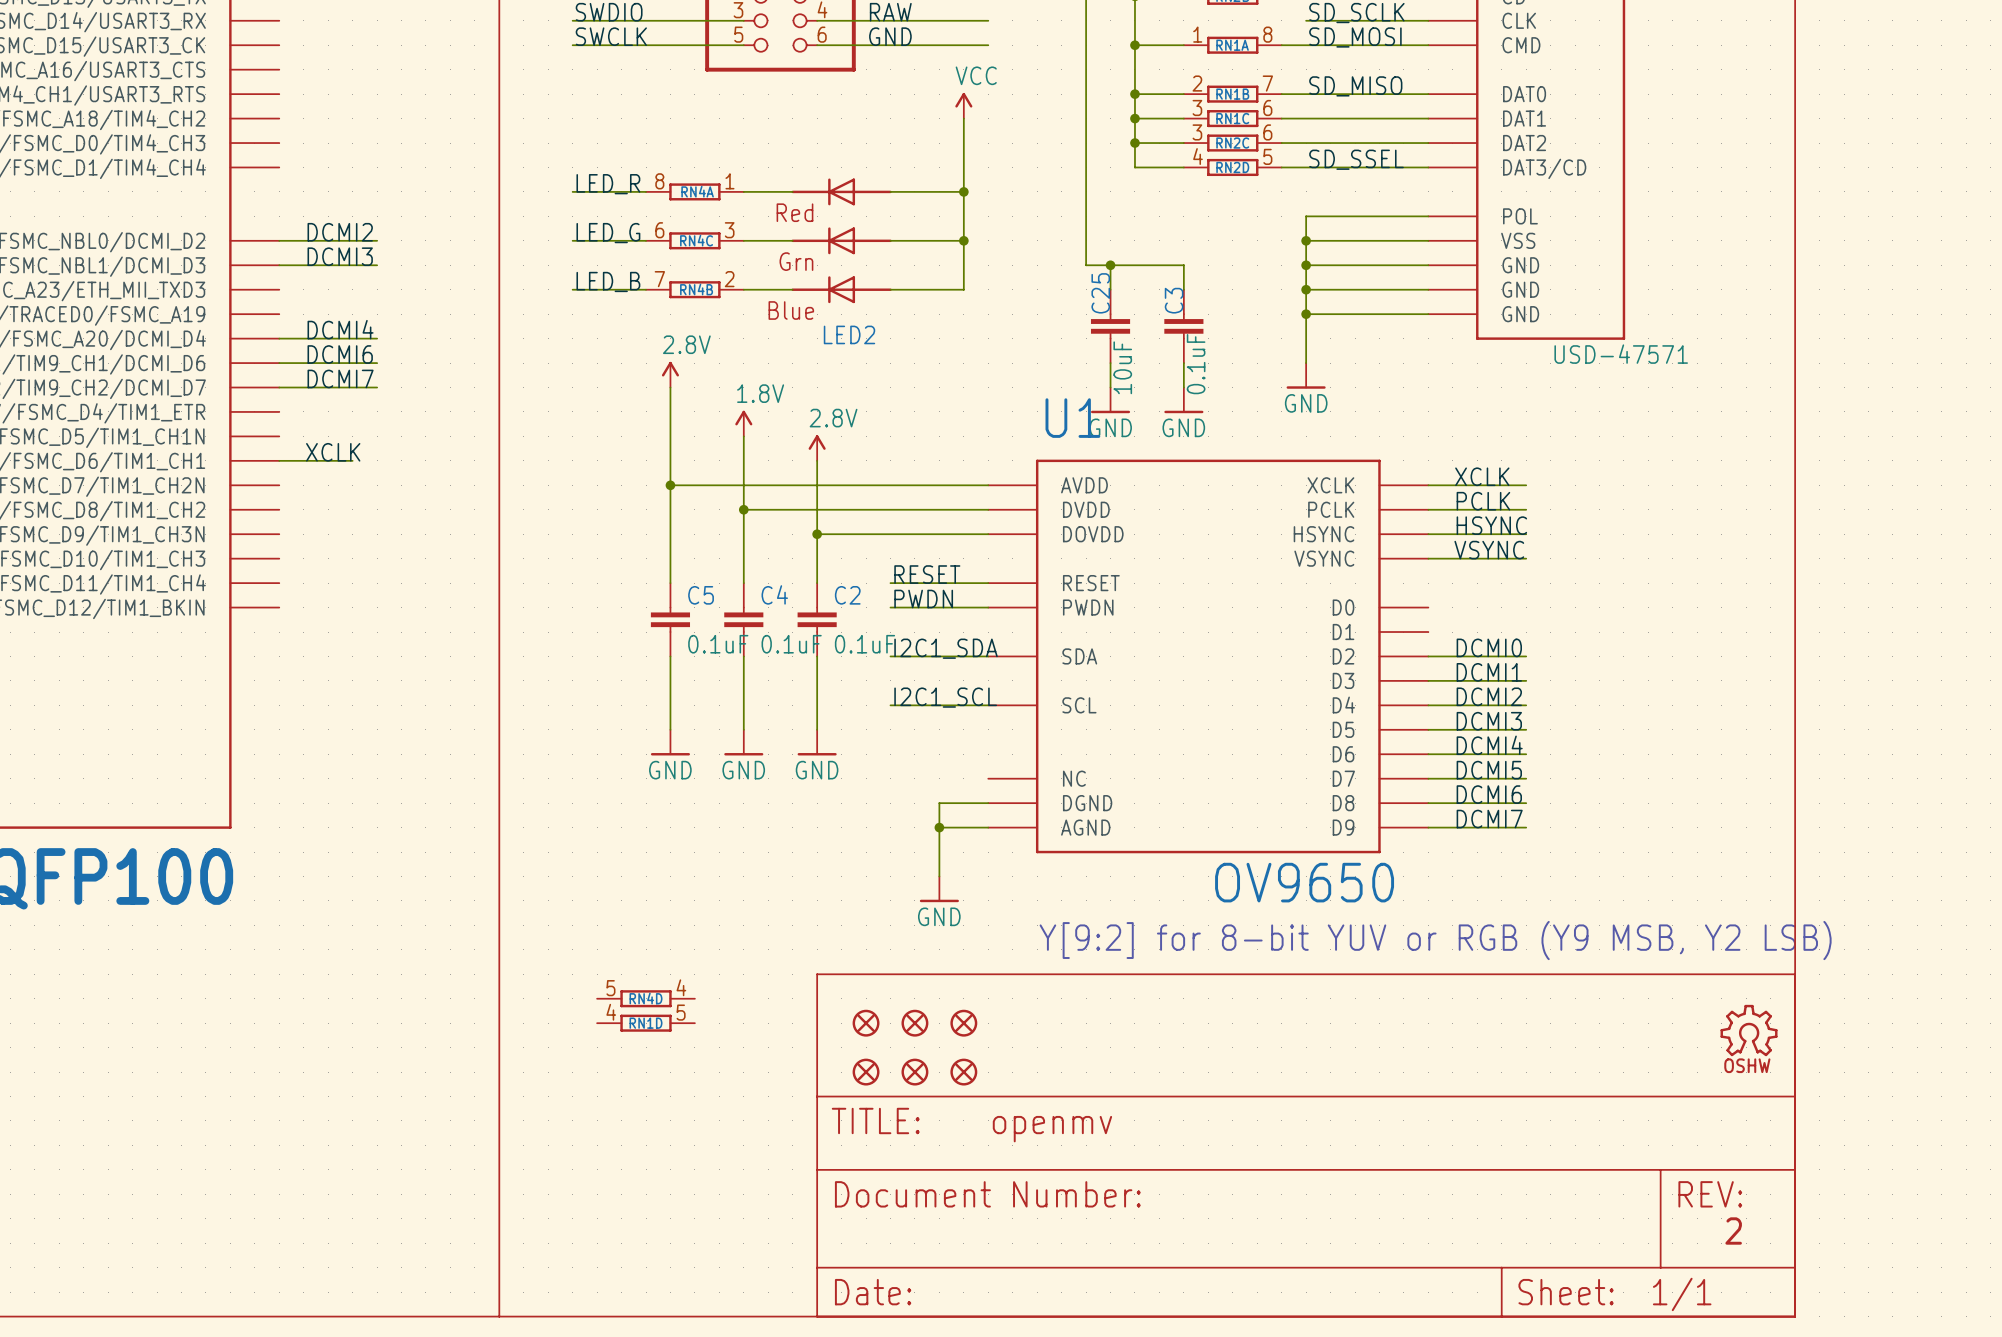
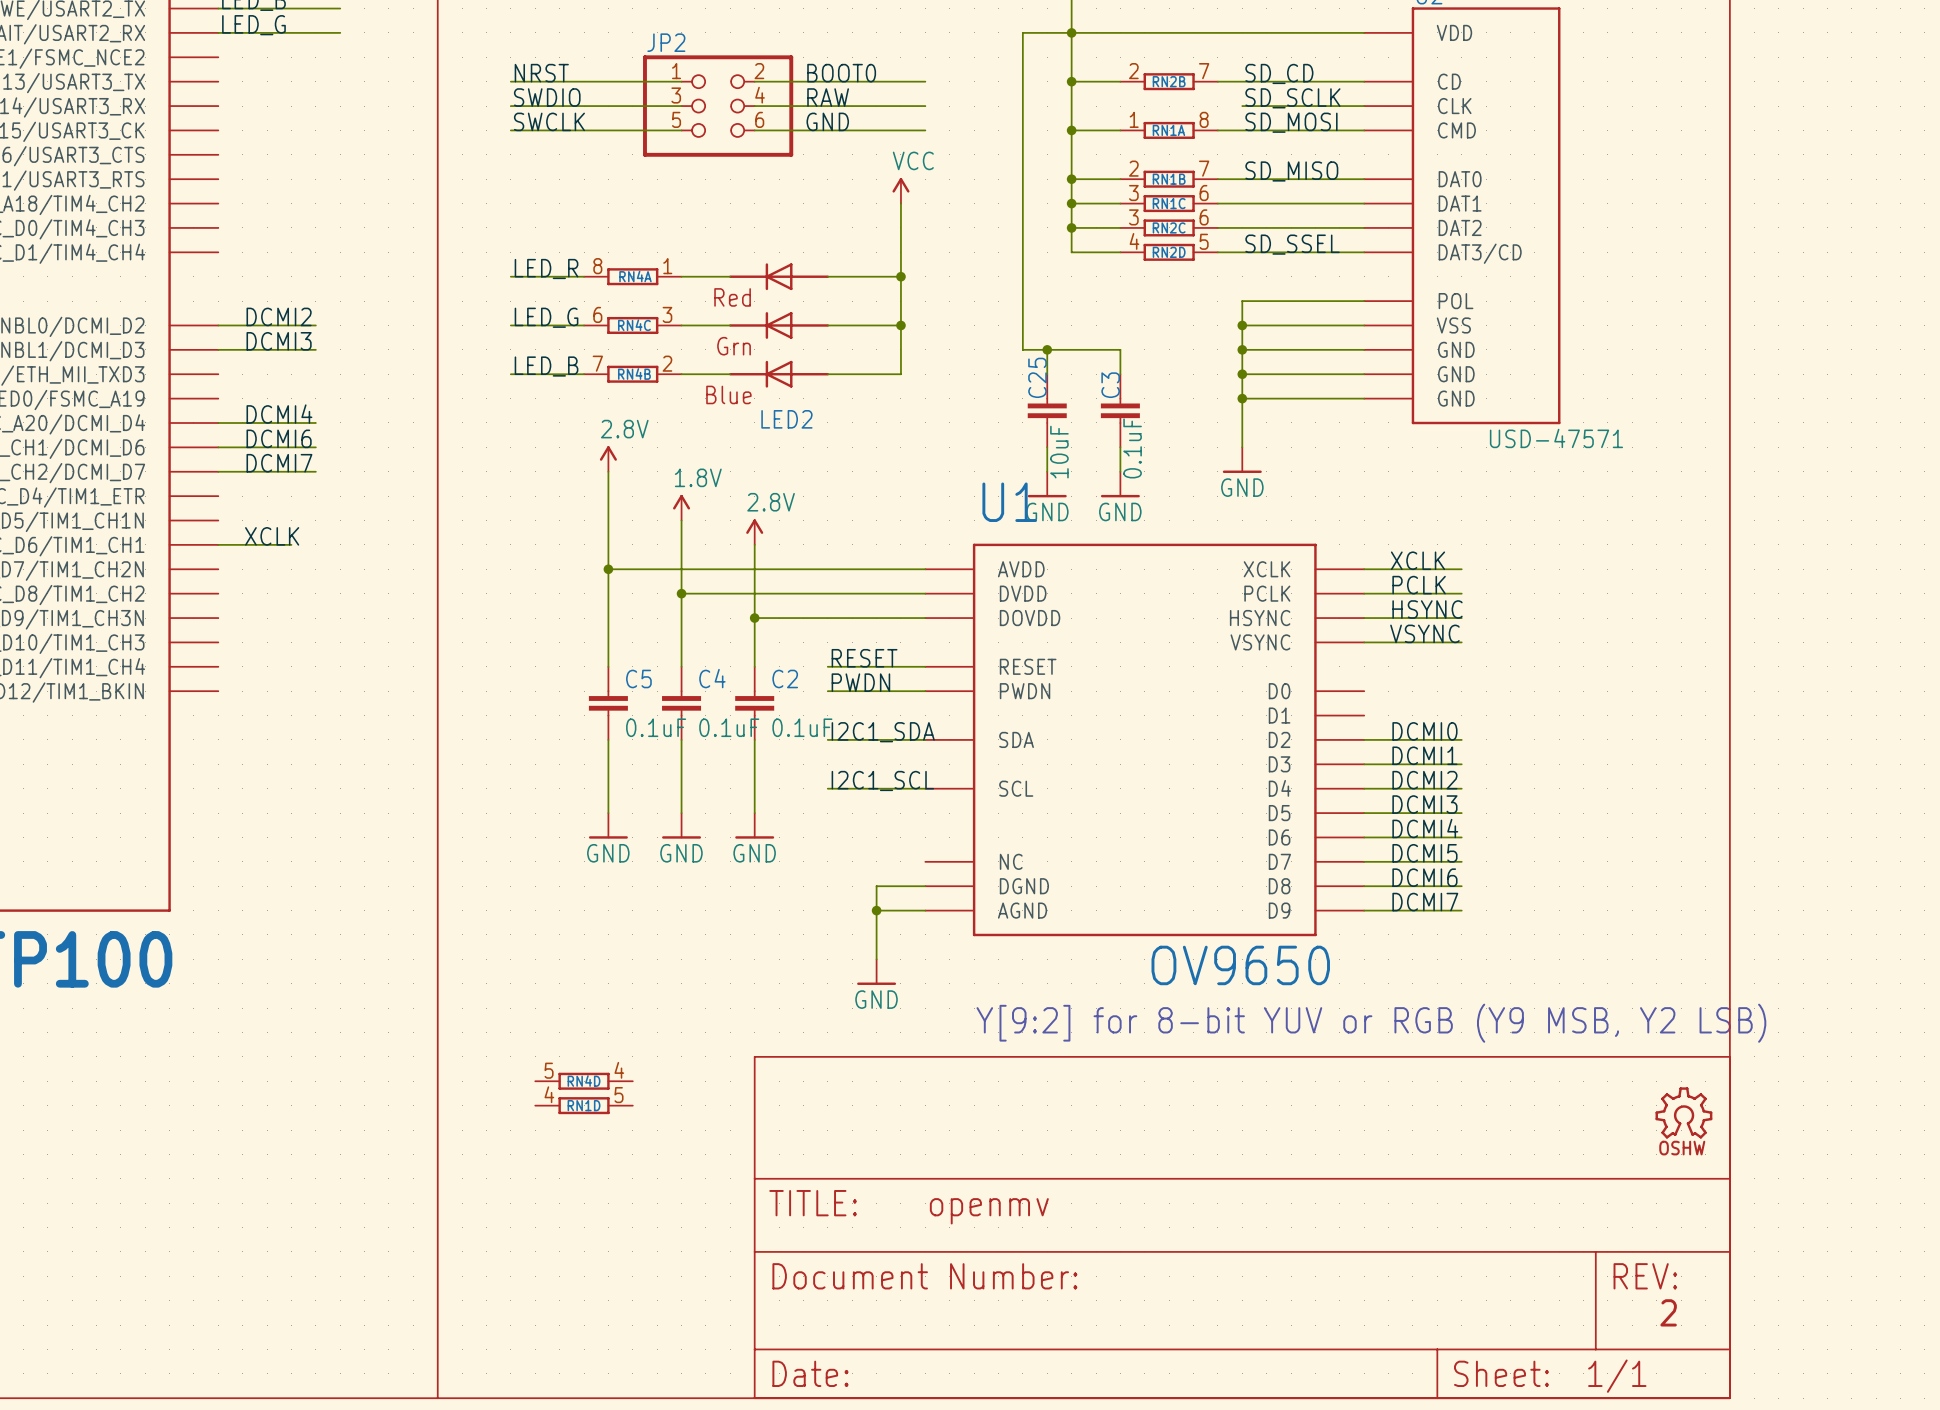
part: (866, 1023) -> none
part: (914, 1023) -> none
part: (963, 1023) -> none
part: (866, 1072) -> none
part: (914, 1072) -> none
part: (963, 1072) -> none

